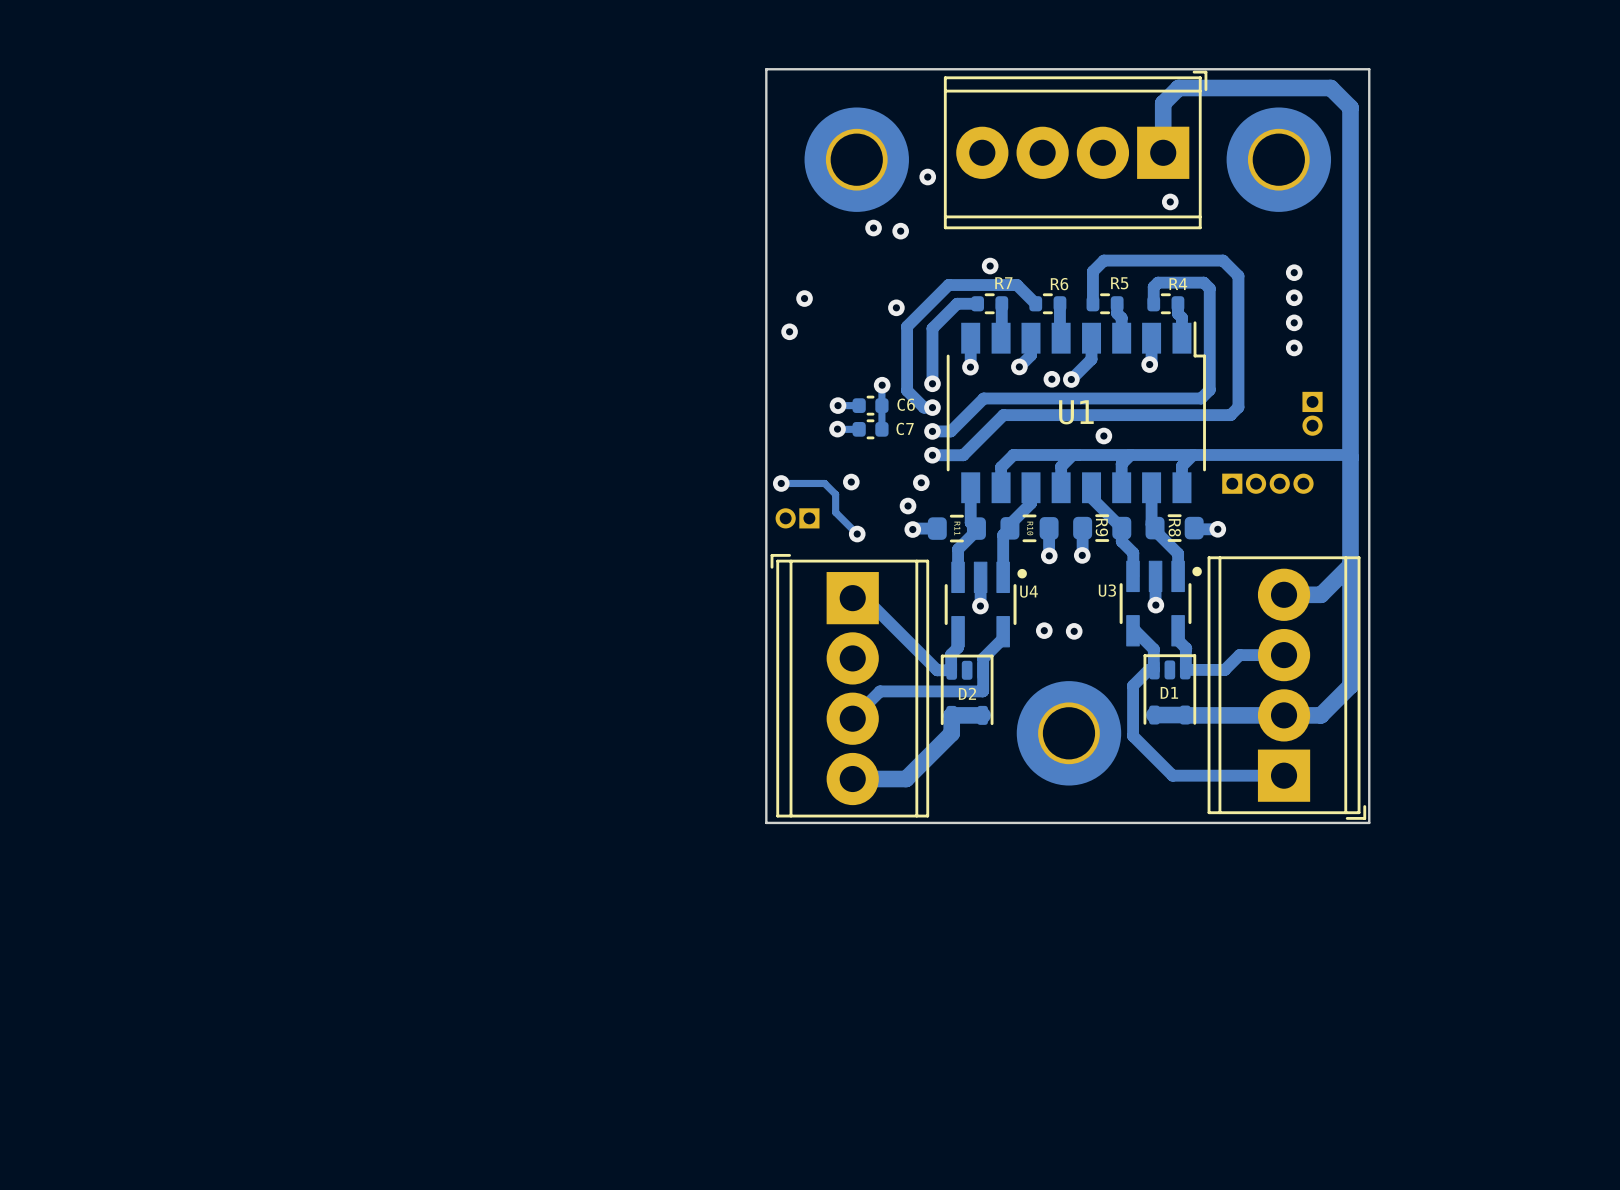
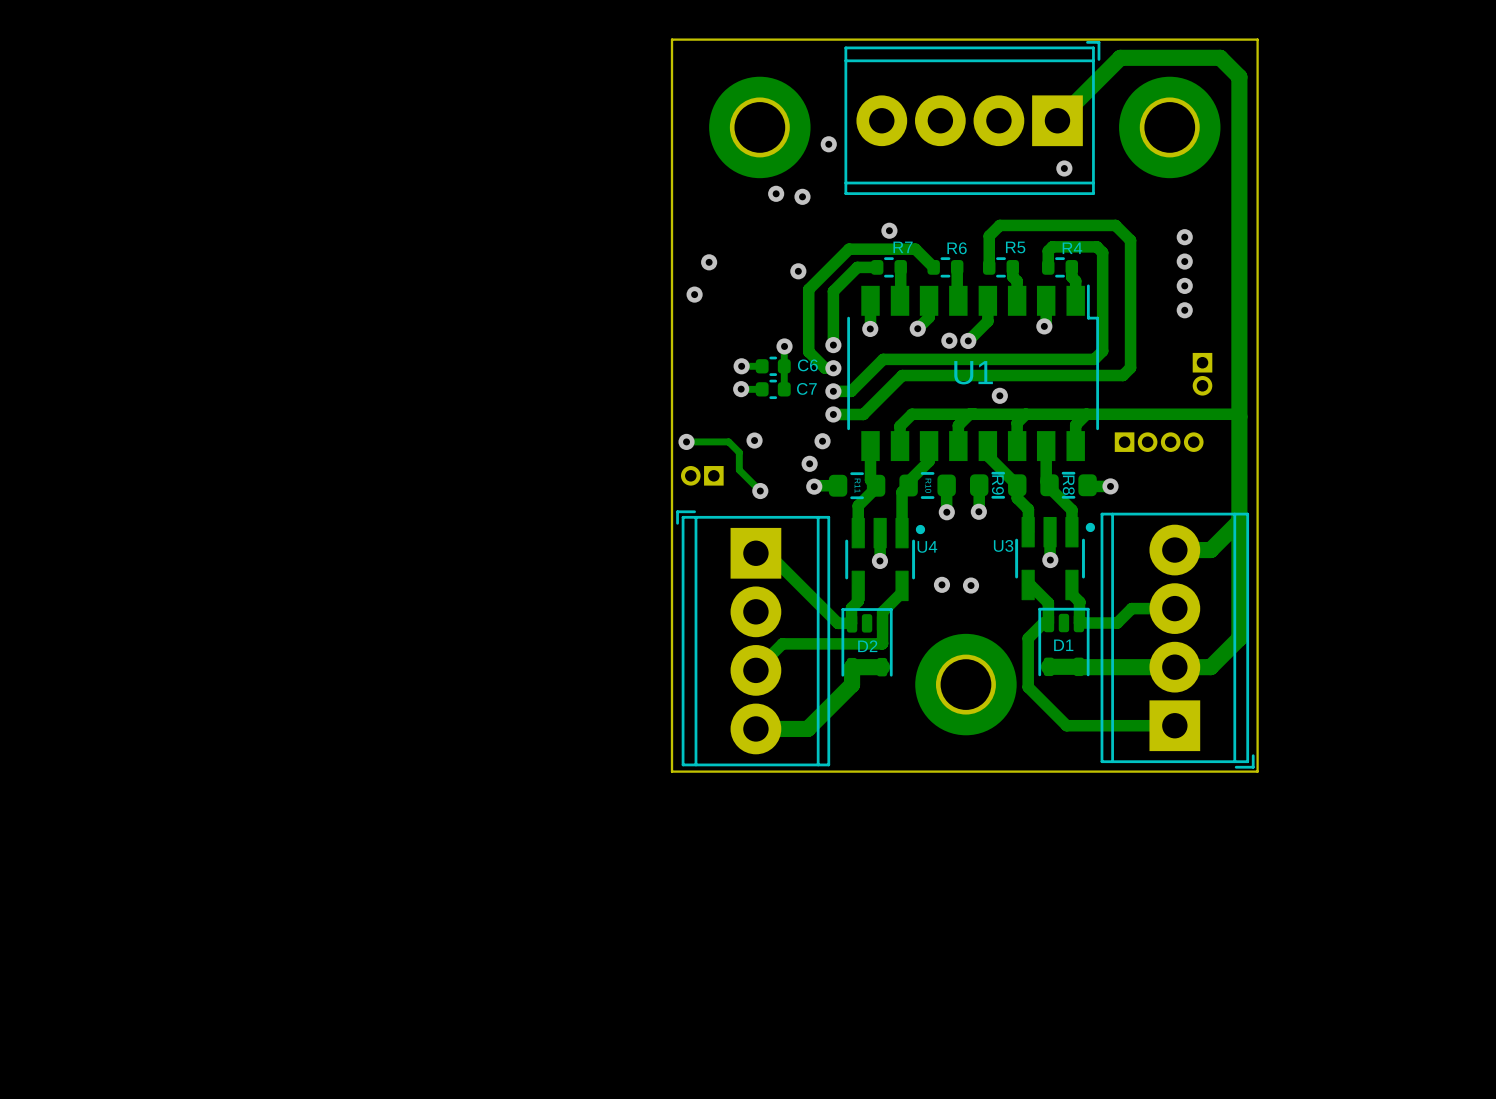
track: (1228, 88) (1178, 88) (1163, 103) (1163, 152) -> (1120, 57) (1057, 120)

